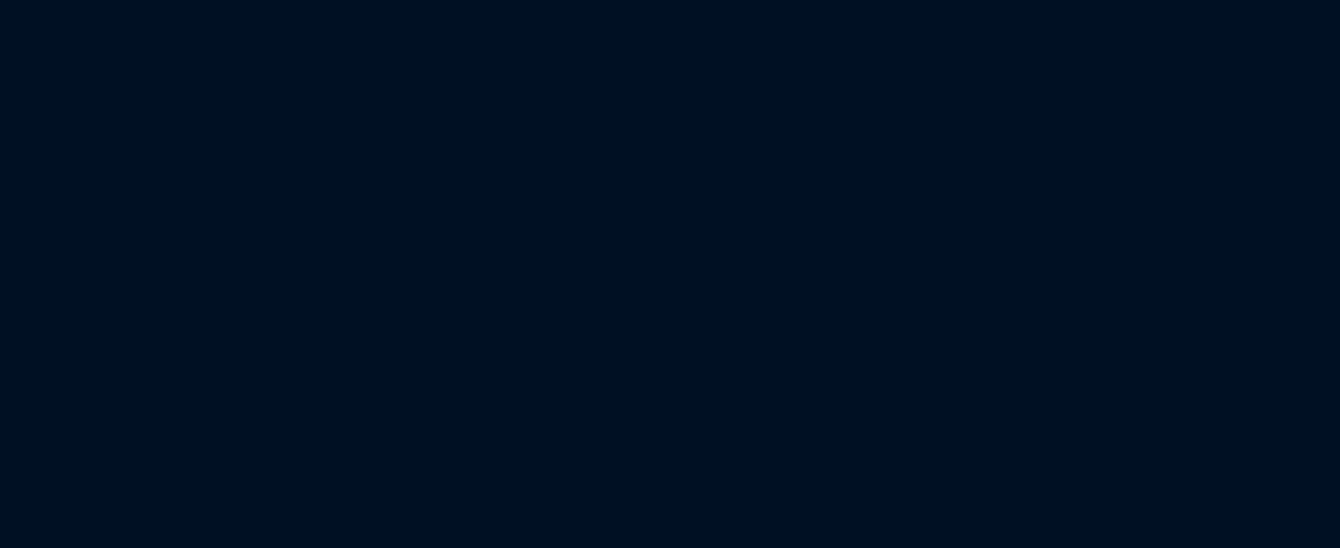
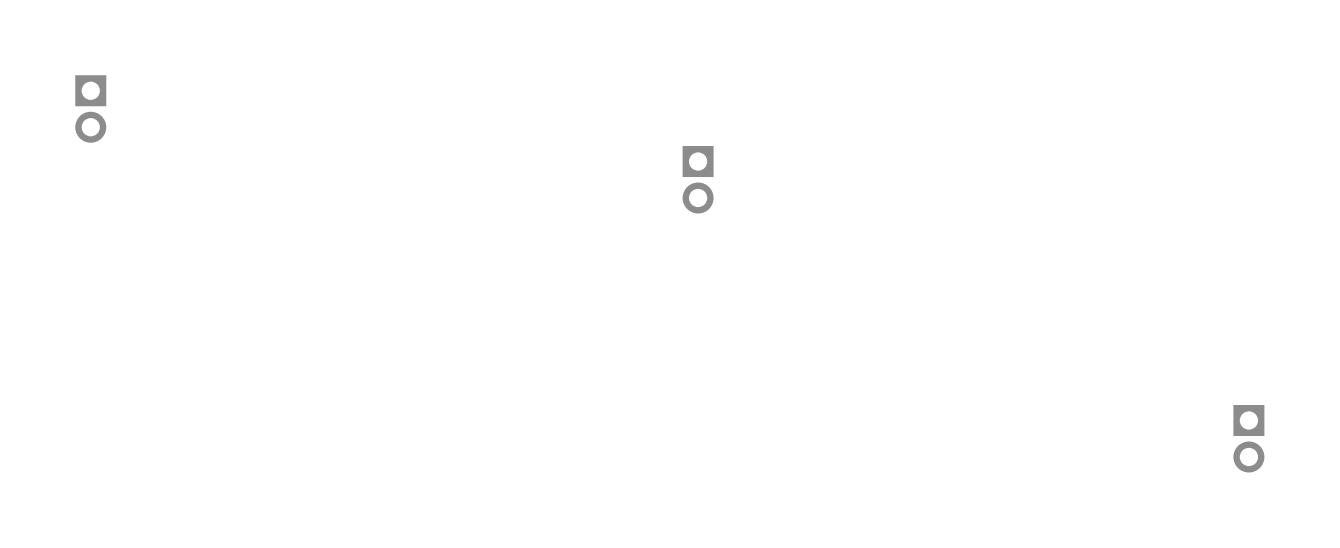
part: none -> (90, 108)
part: none -> (698, 179)
part: none -> (1248, 438)

